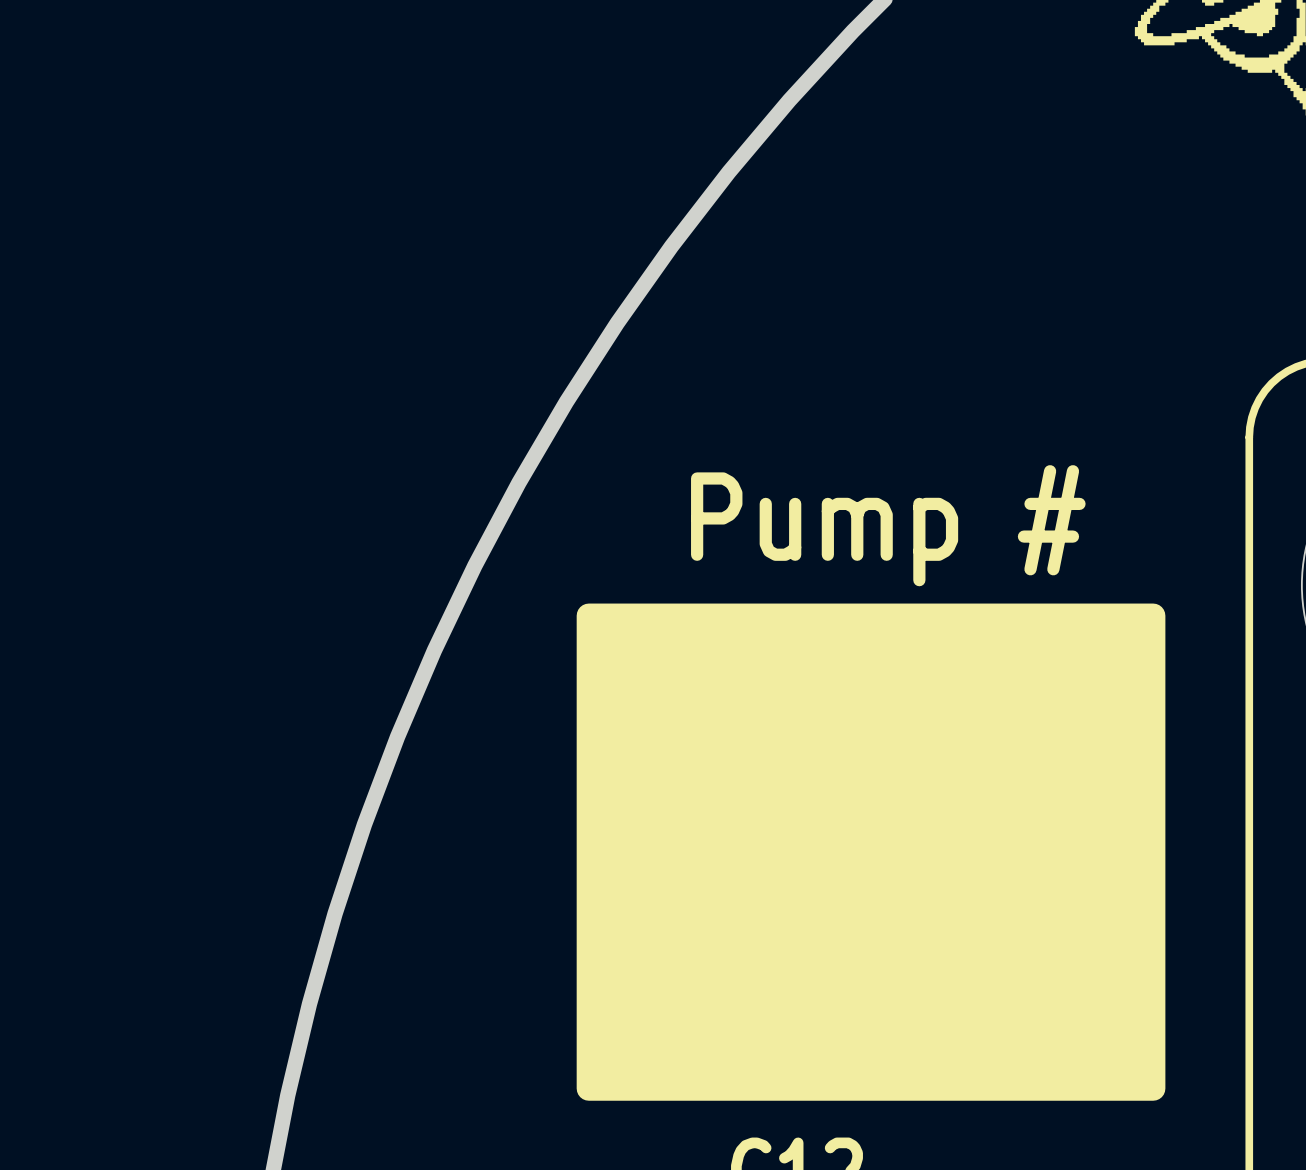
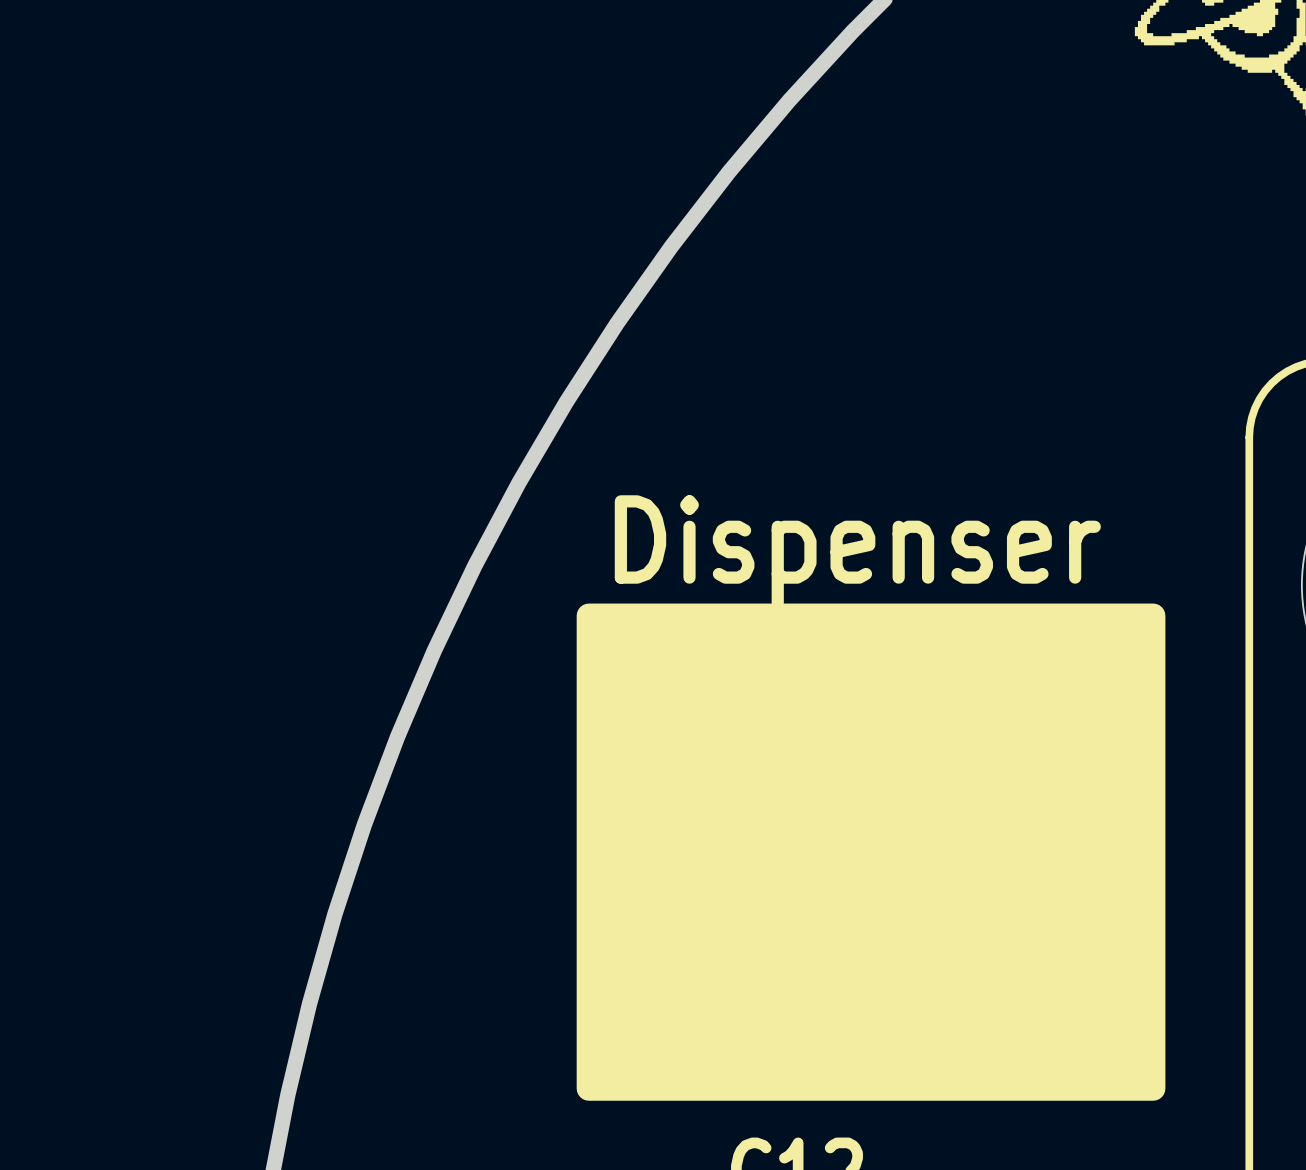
text: Pump # (888, 525) -> none
text: none -> Dispenser (857, 552)

